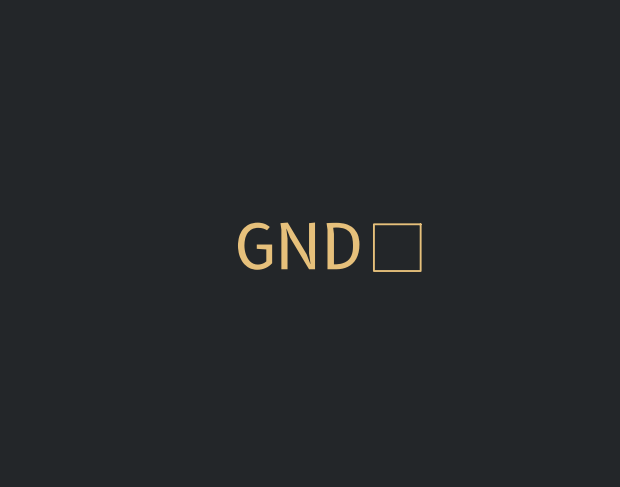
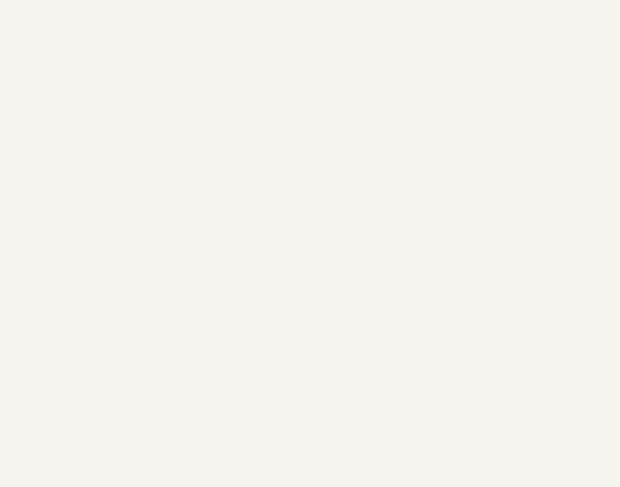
hierarchical label: GND (298, 246) -> none

